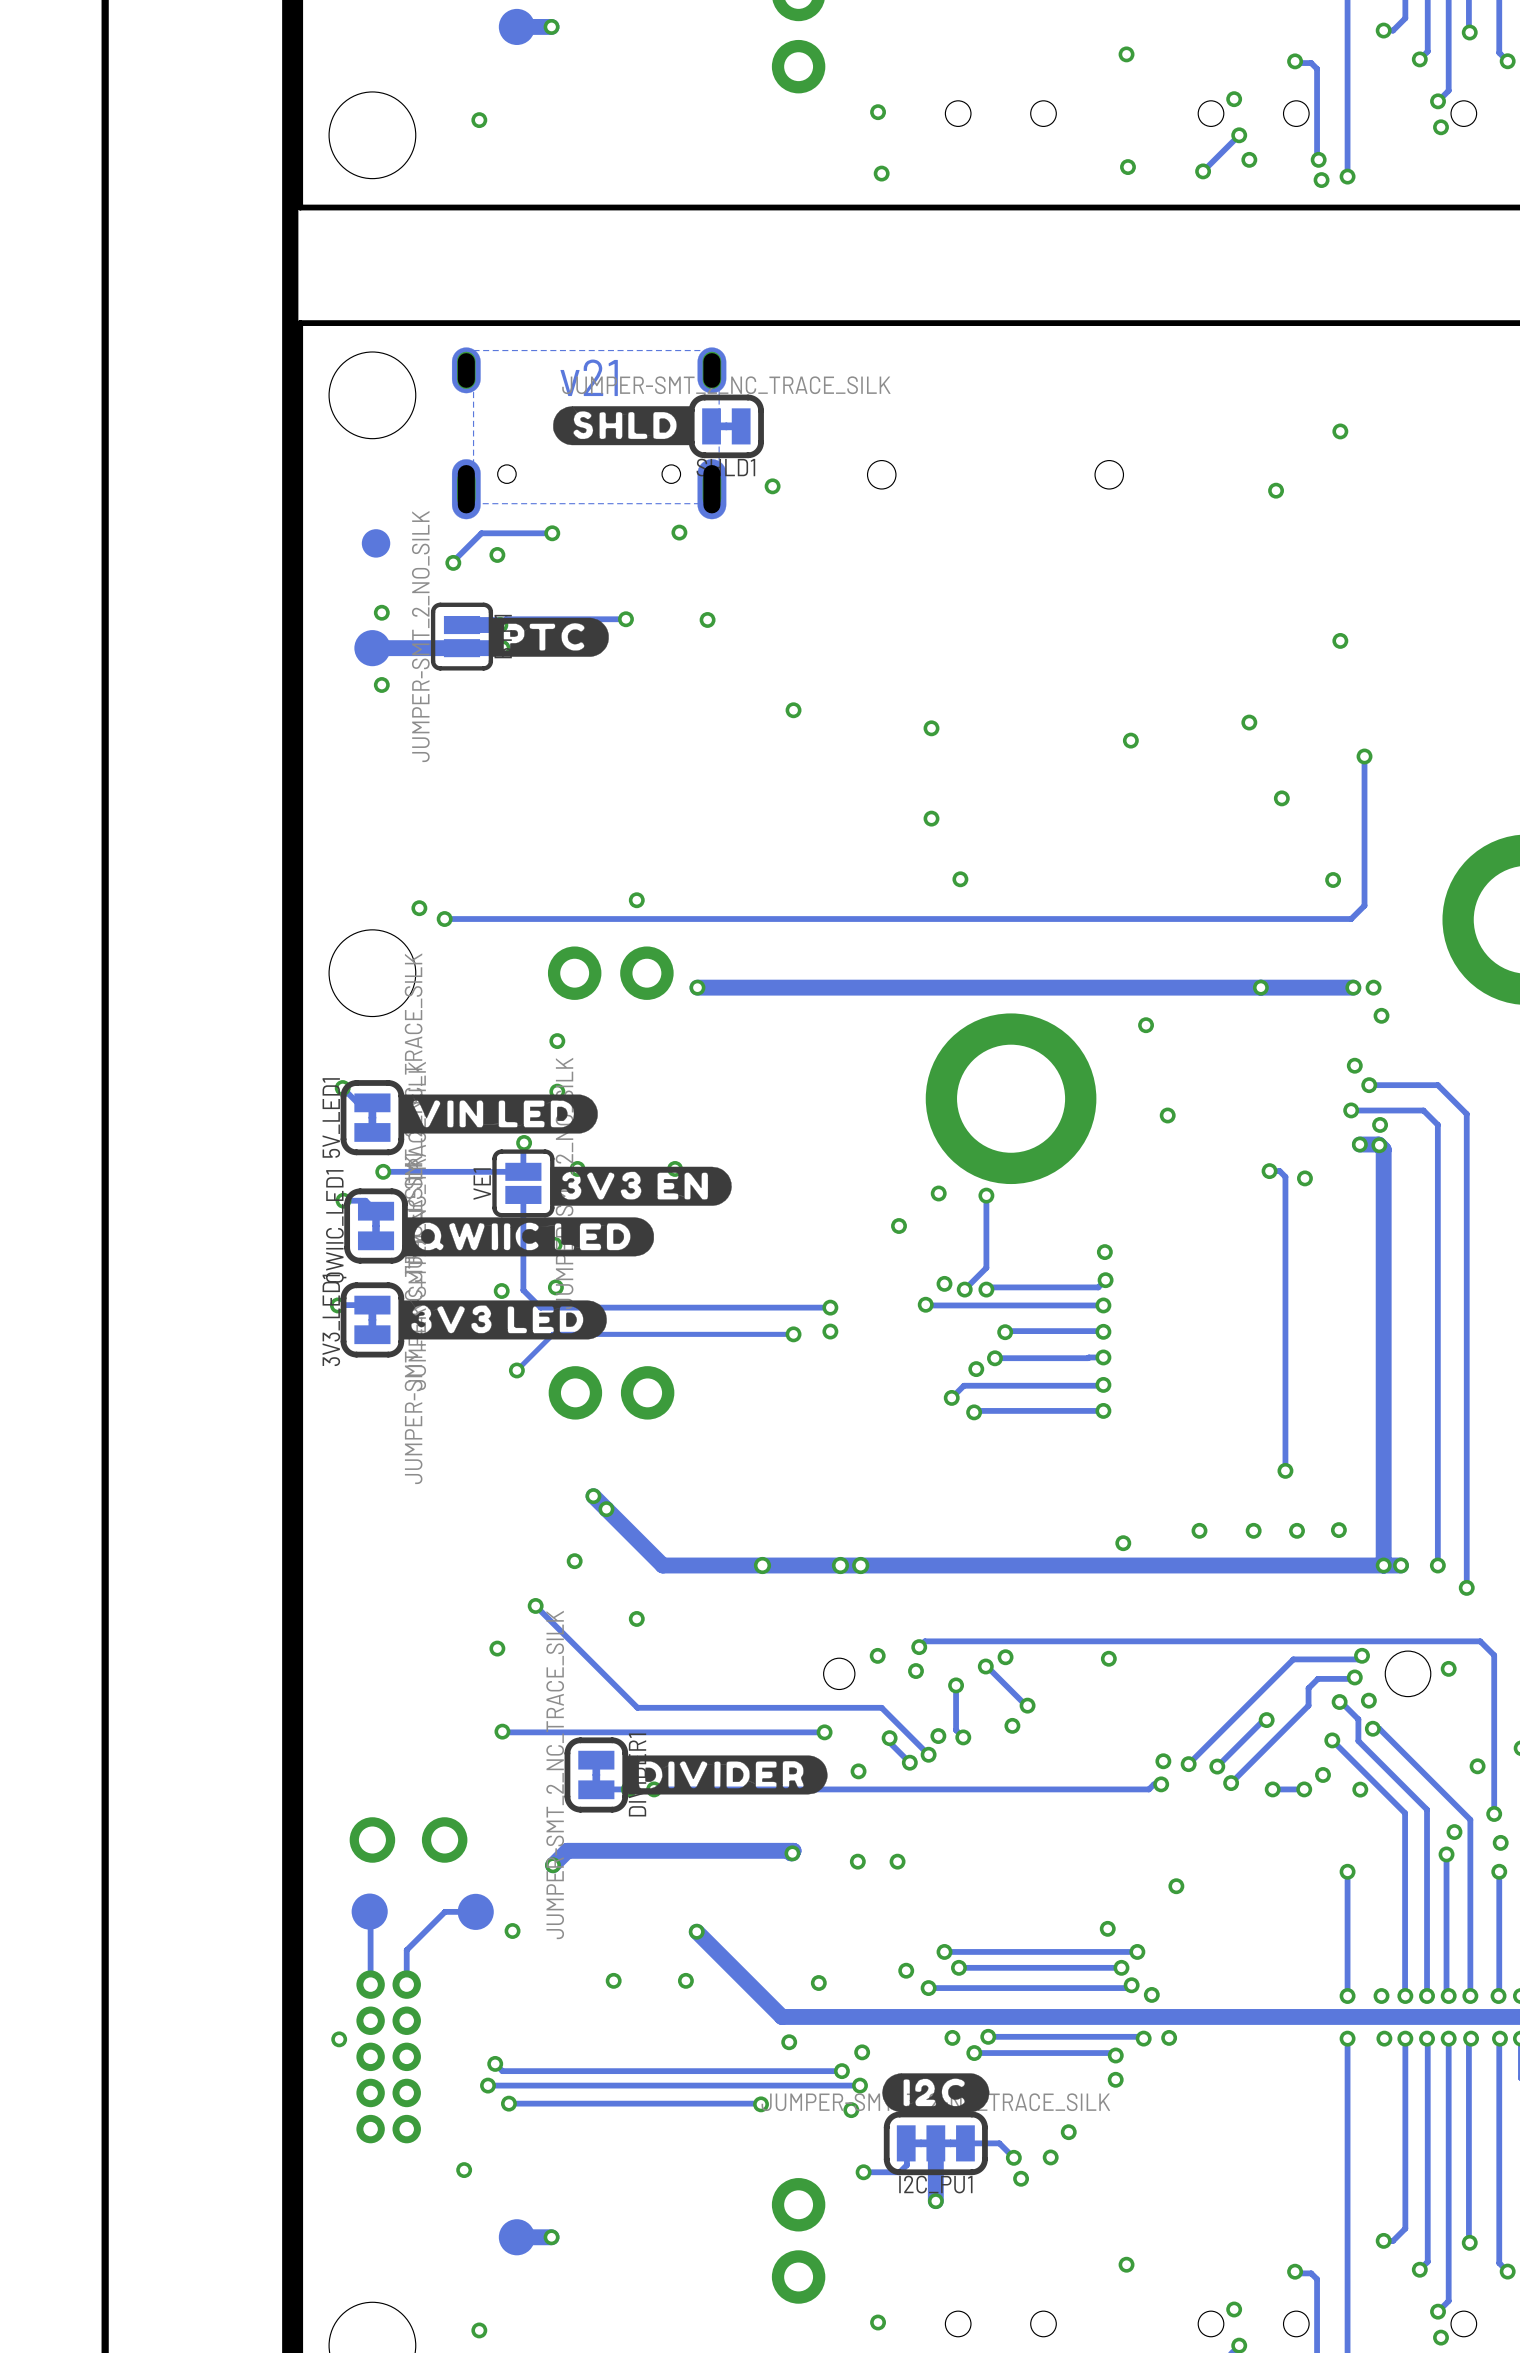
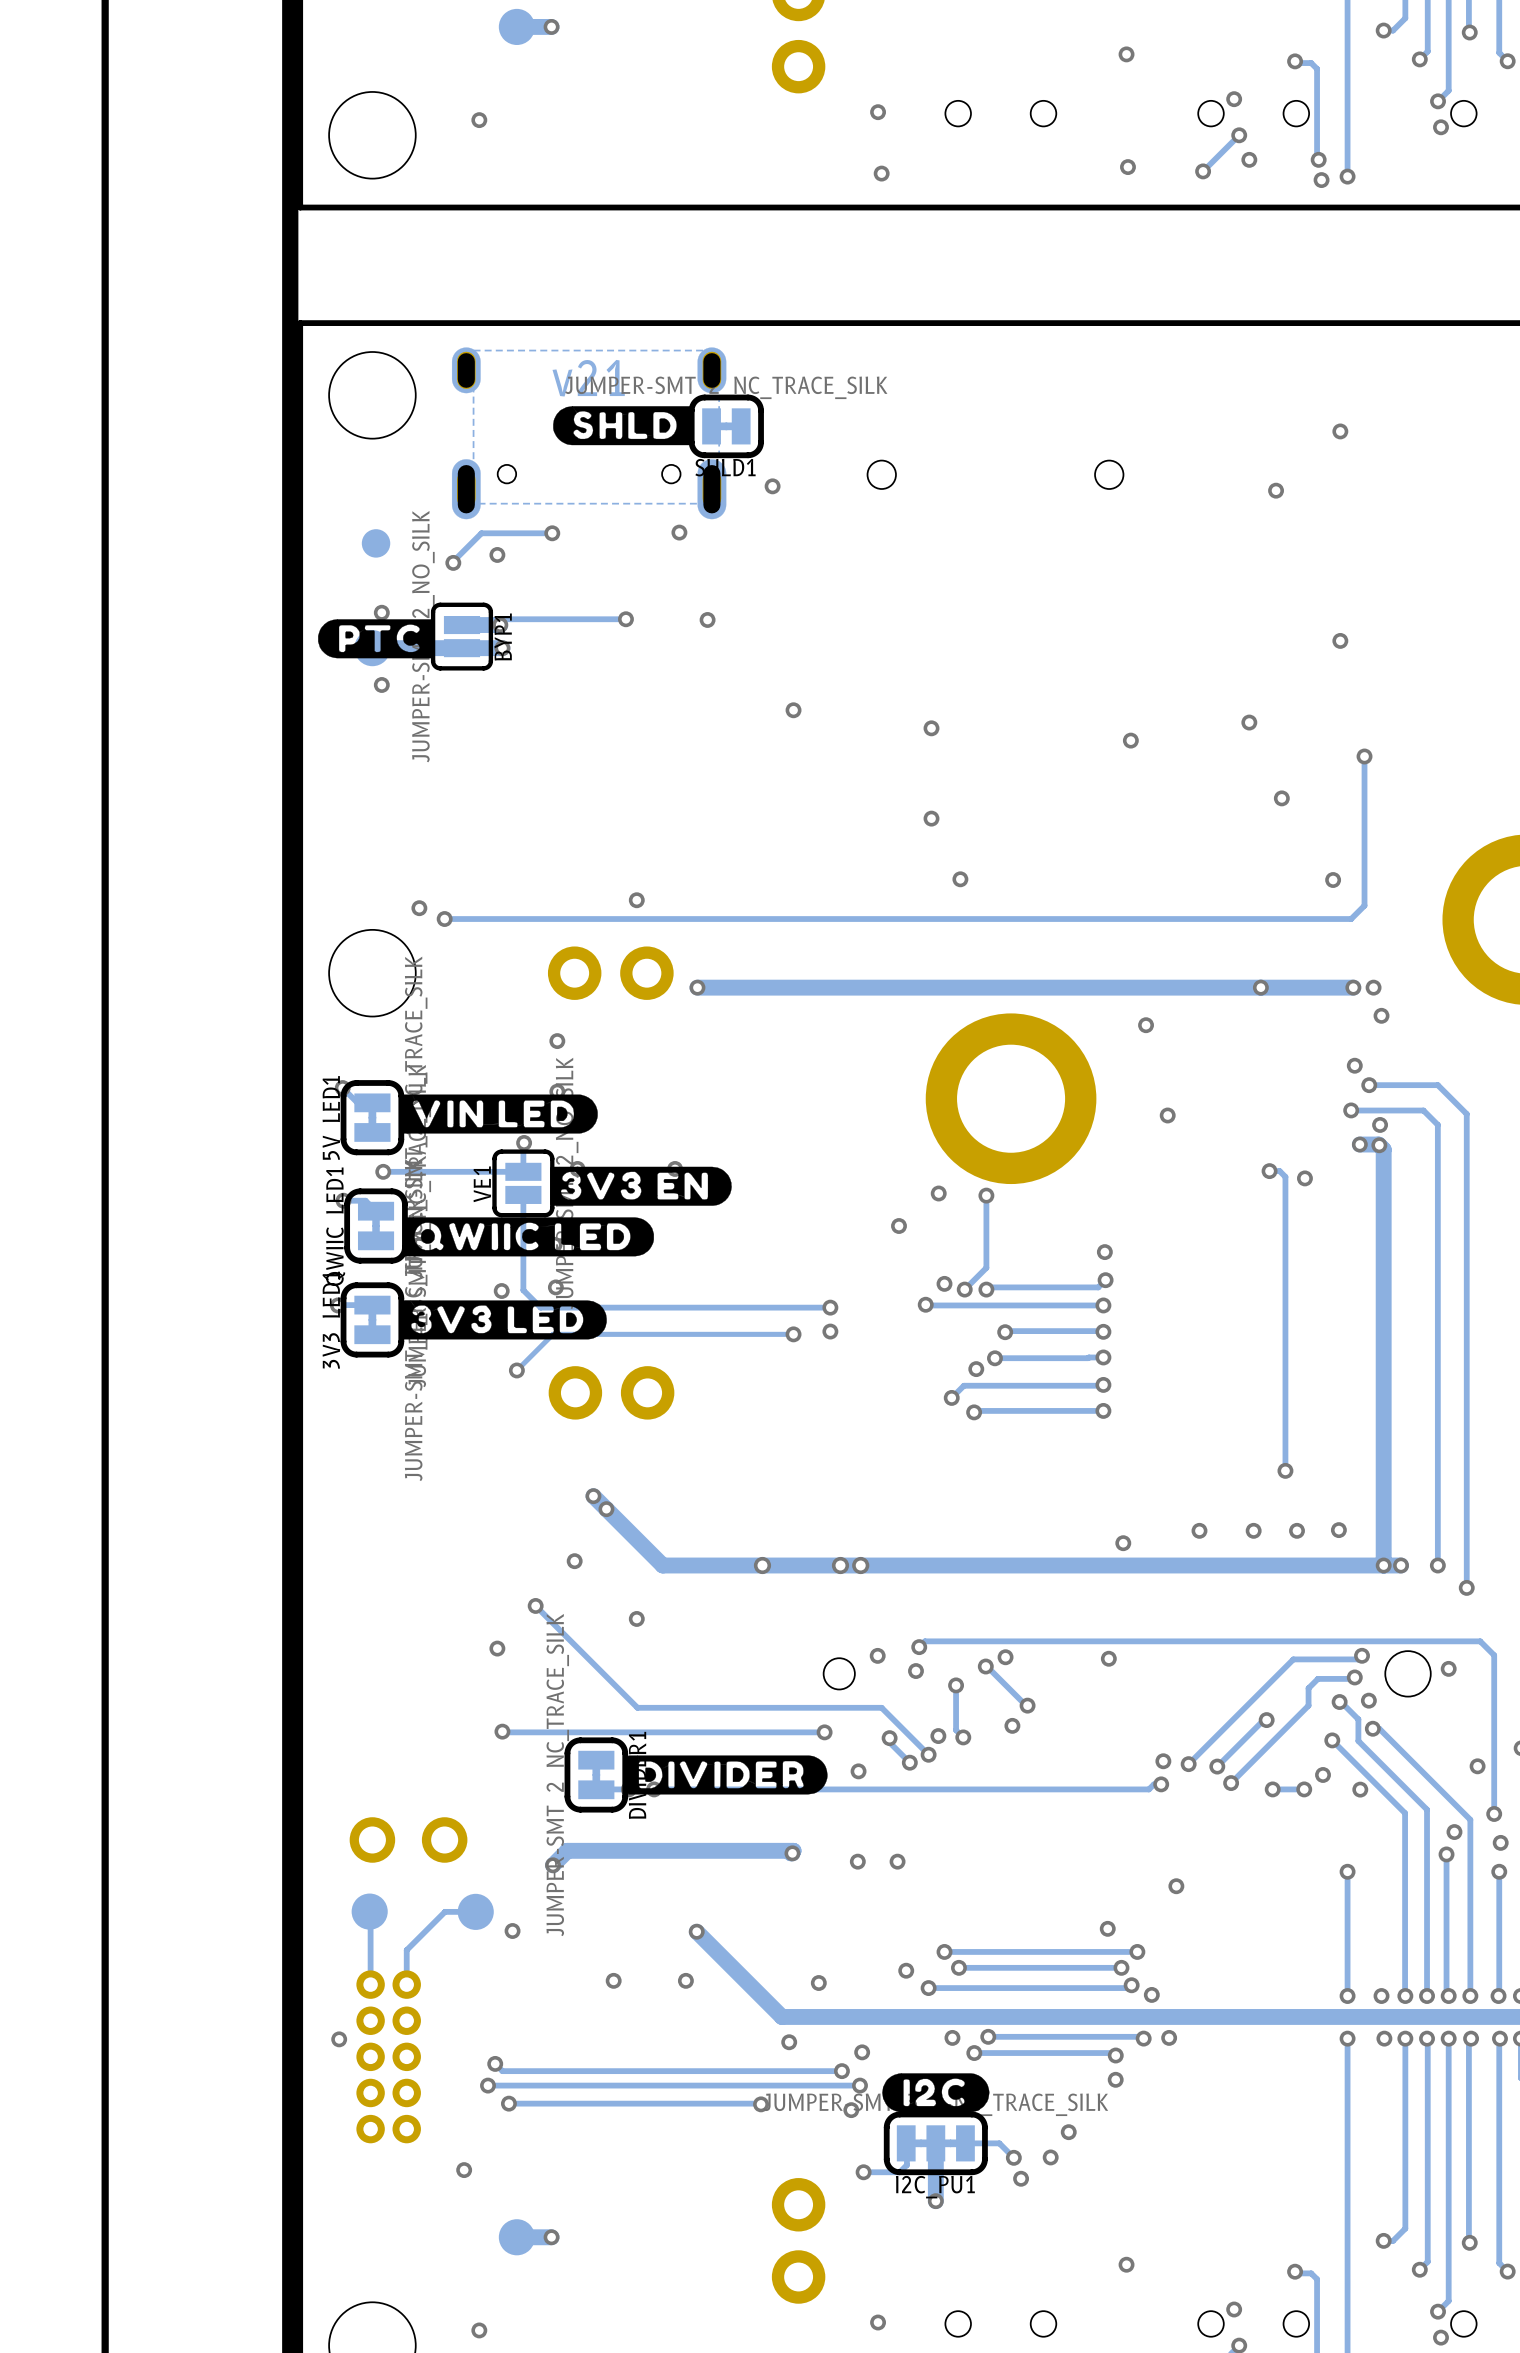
drawing: [492, 617, 609, 657] -> none
drawing: none -> [318, 619, 435, 659]

